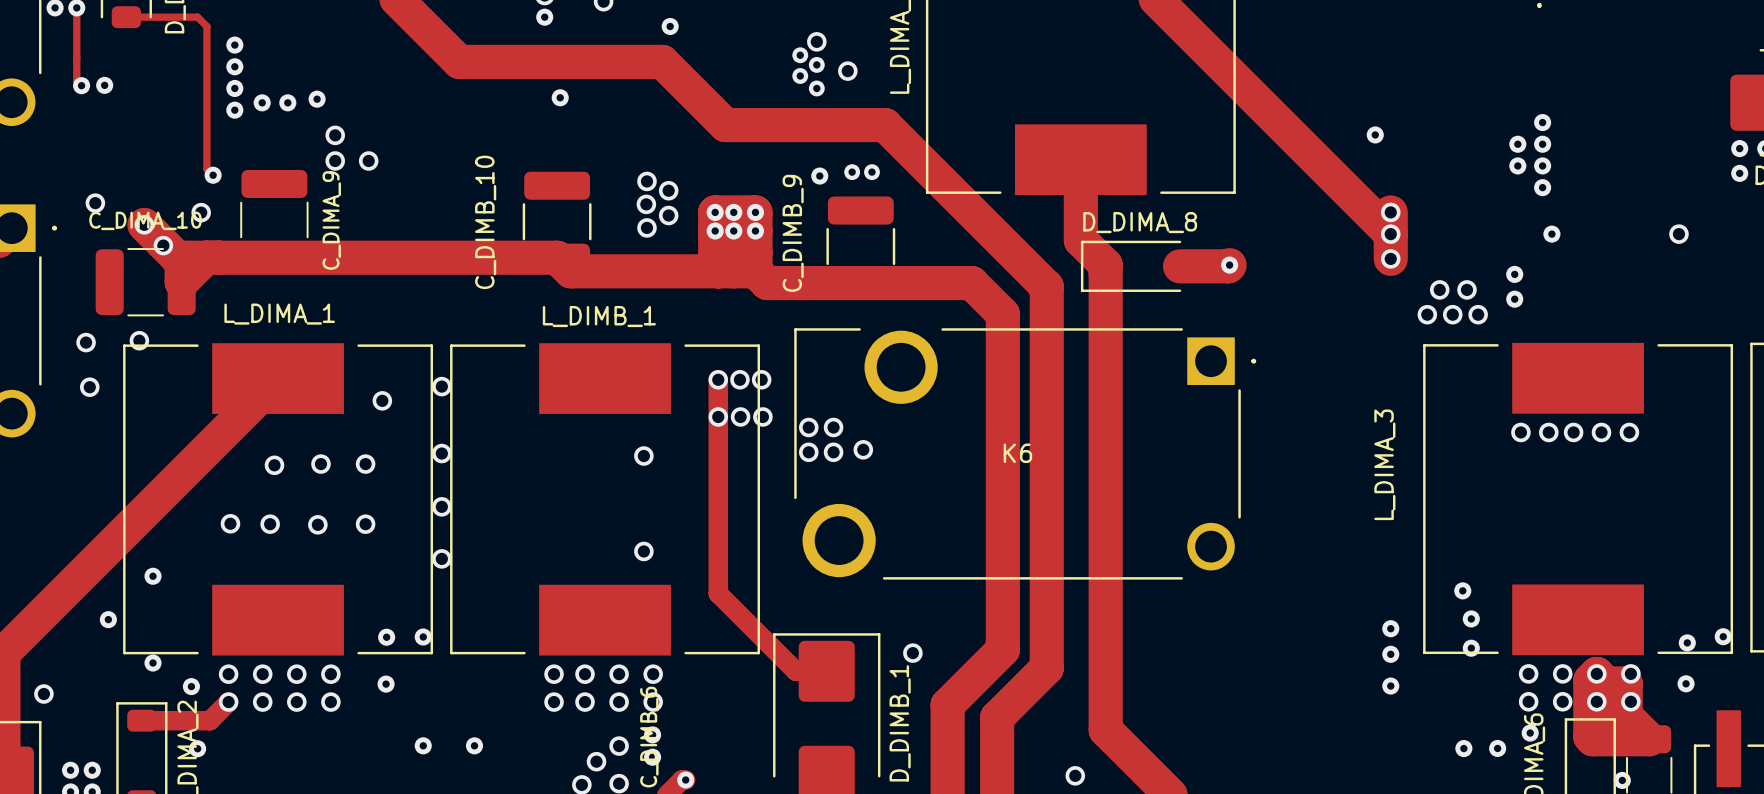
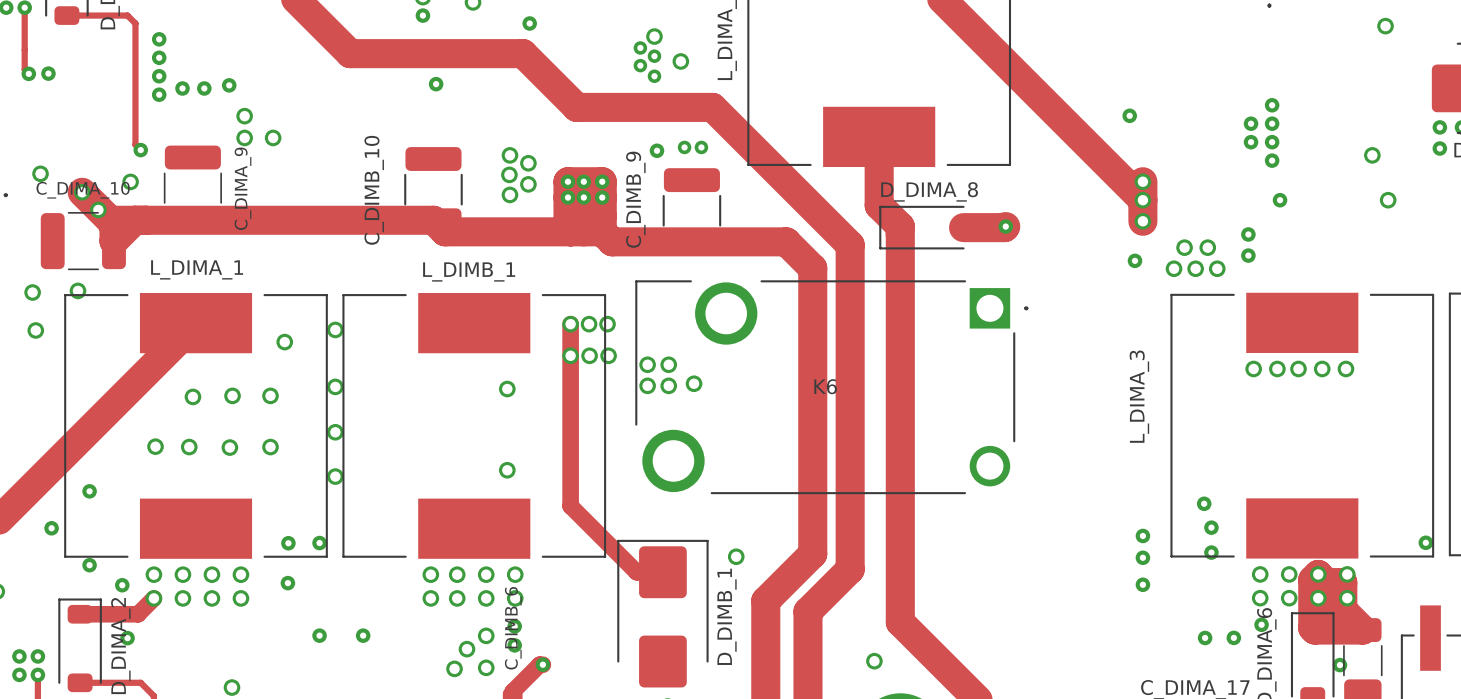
via: none -> (1385, 26)
via: none -> (1372, 155)
via: none -> (1134, 260)
via: (1687, 642) -> none
via: (1686, 683) -> none

